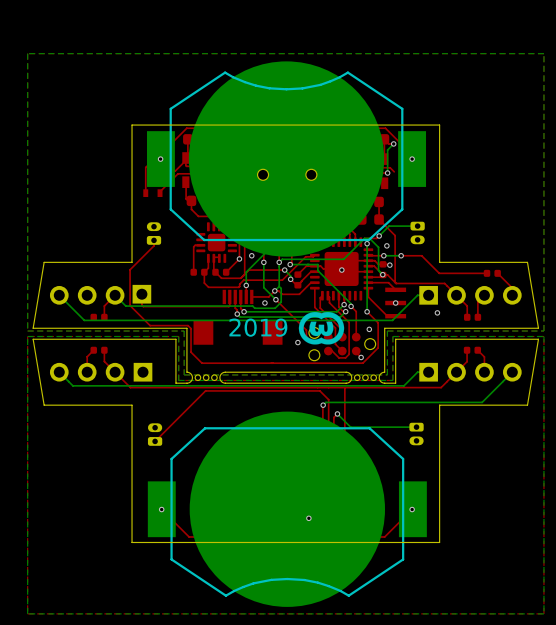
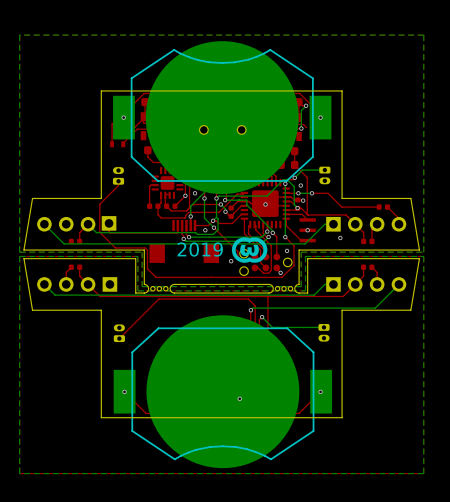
top track: (186, 182) (186, 198) (188, 200) -> none

